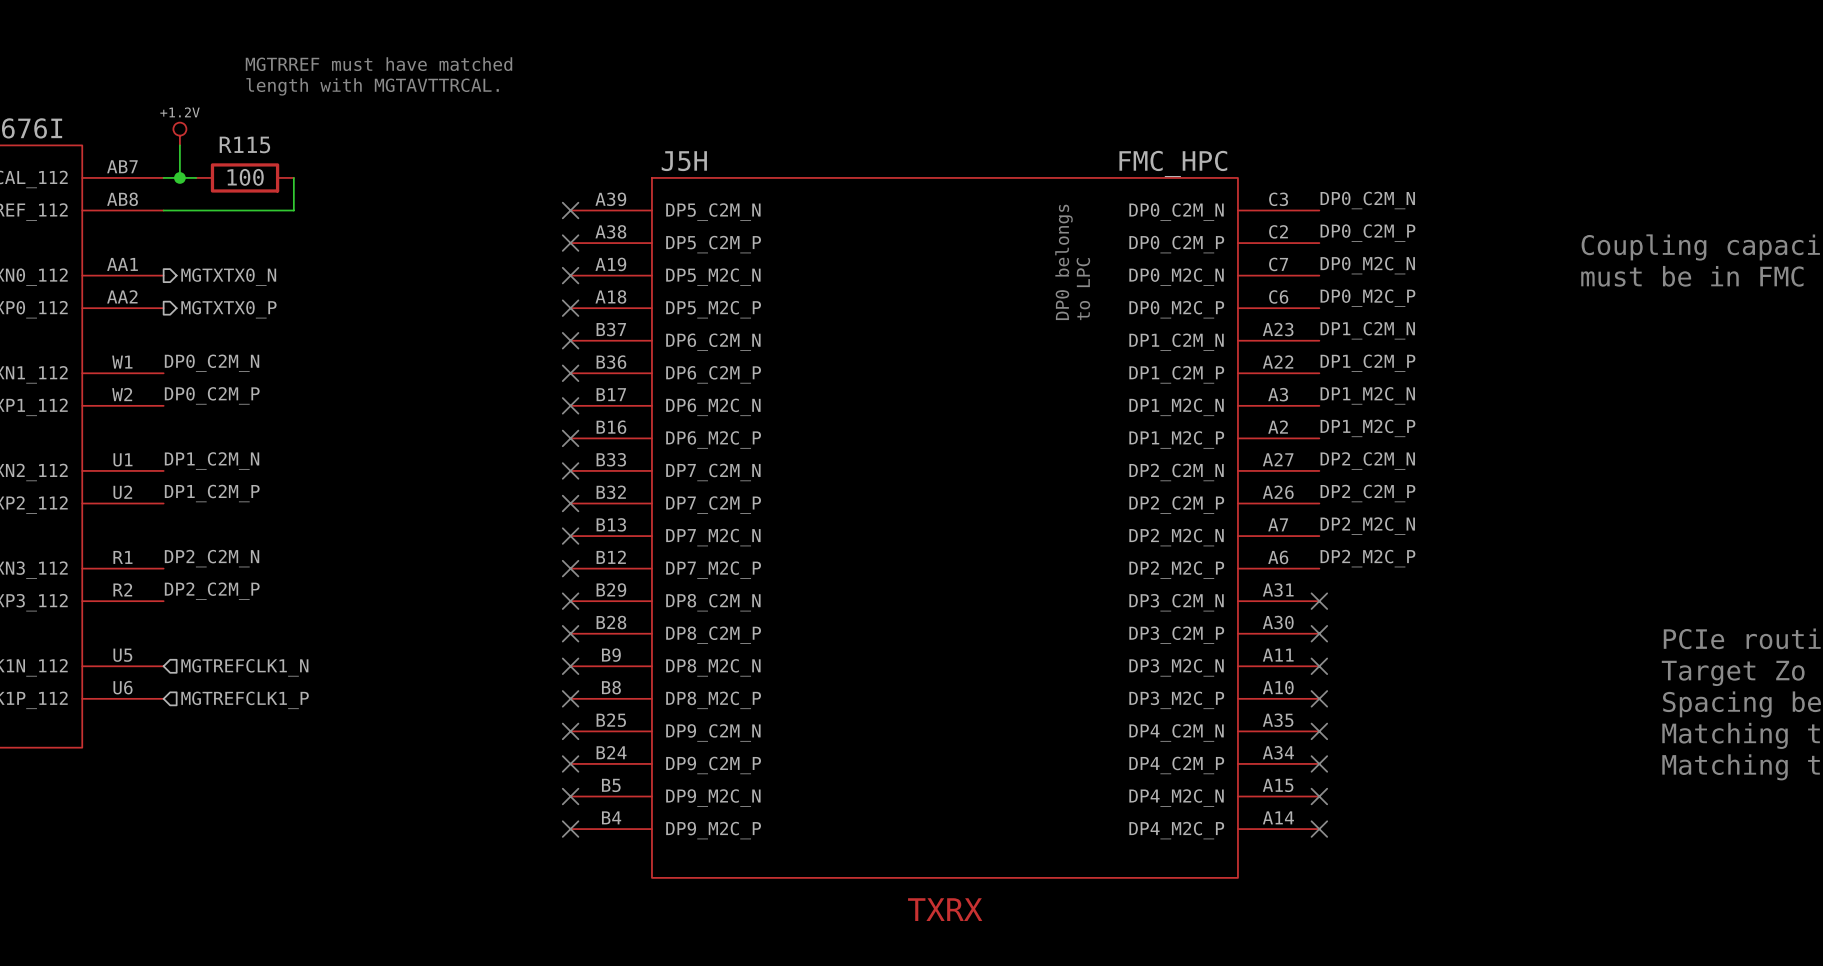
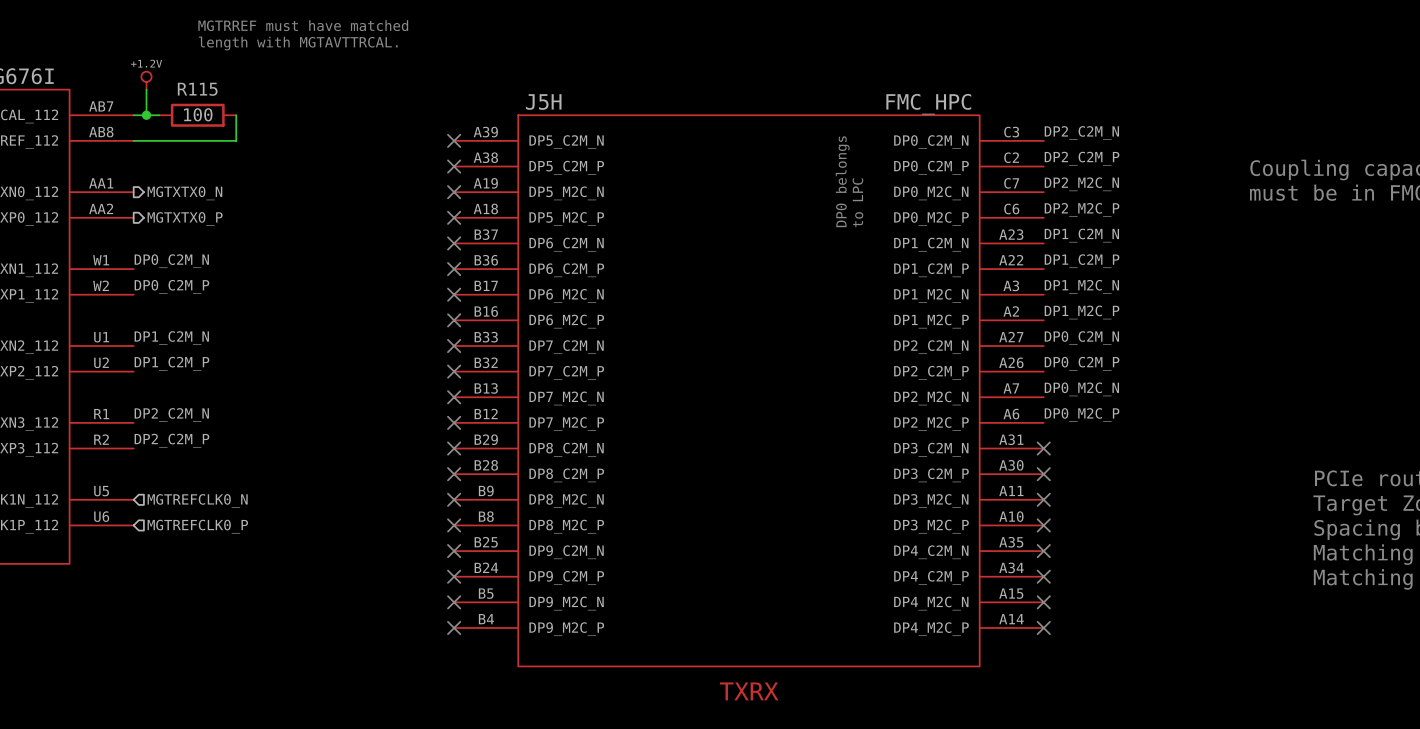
label: DP0_C2M_N (1367, 200) -> DP2_C2M_N (1081, 133)
label: DP0_C2M_P (1367, 233) -> DP2_C2M_P (1082, 158)
label: DP0_M2C_N (1367, 265) -> DP2_M2C_N (1081, 184)
label: DP0_M2C_P (1367, 298) -> DP2_M2C_P (1082, 209)
label: DP2_C2M_N (1367, 460) -> DP0_C2M_N (1081, 338)
label: DP2_C2M_P (1367, 493) -> DP0_C2M_P (1082, 363)
label: DP2_M2C_N (1367, 526) -> DP0_M2C_N (1081, 389)
label: DP2_M2C_P (1367, 558) -> DP0_M2C_P (1082, 415)
hierarchical label: MGTREFCLK1_N (244, 667) -> MGTREFCLK0_N (197, 500)
hierarchical label: MGTREFCLK1_P (245, 700) -> MGTREFCLK0_P (197, 526)

